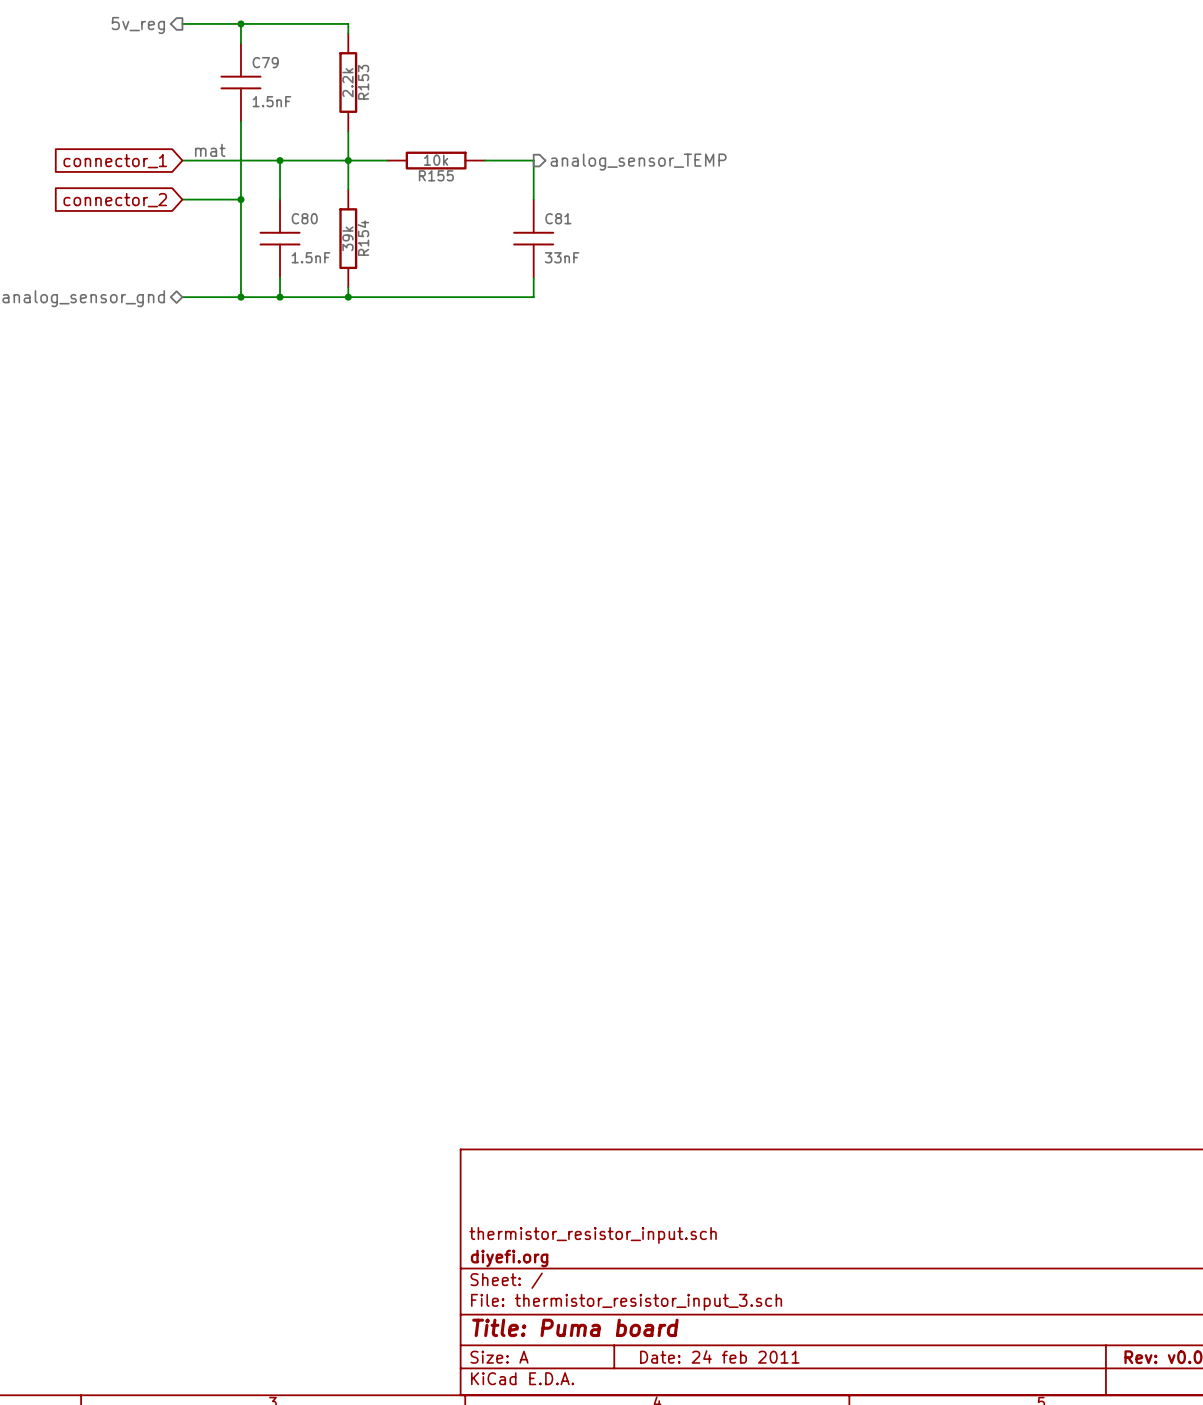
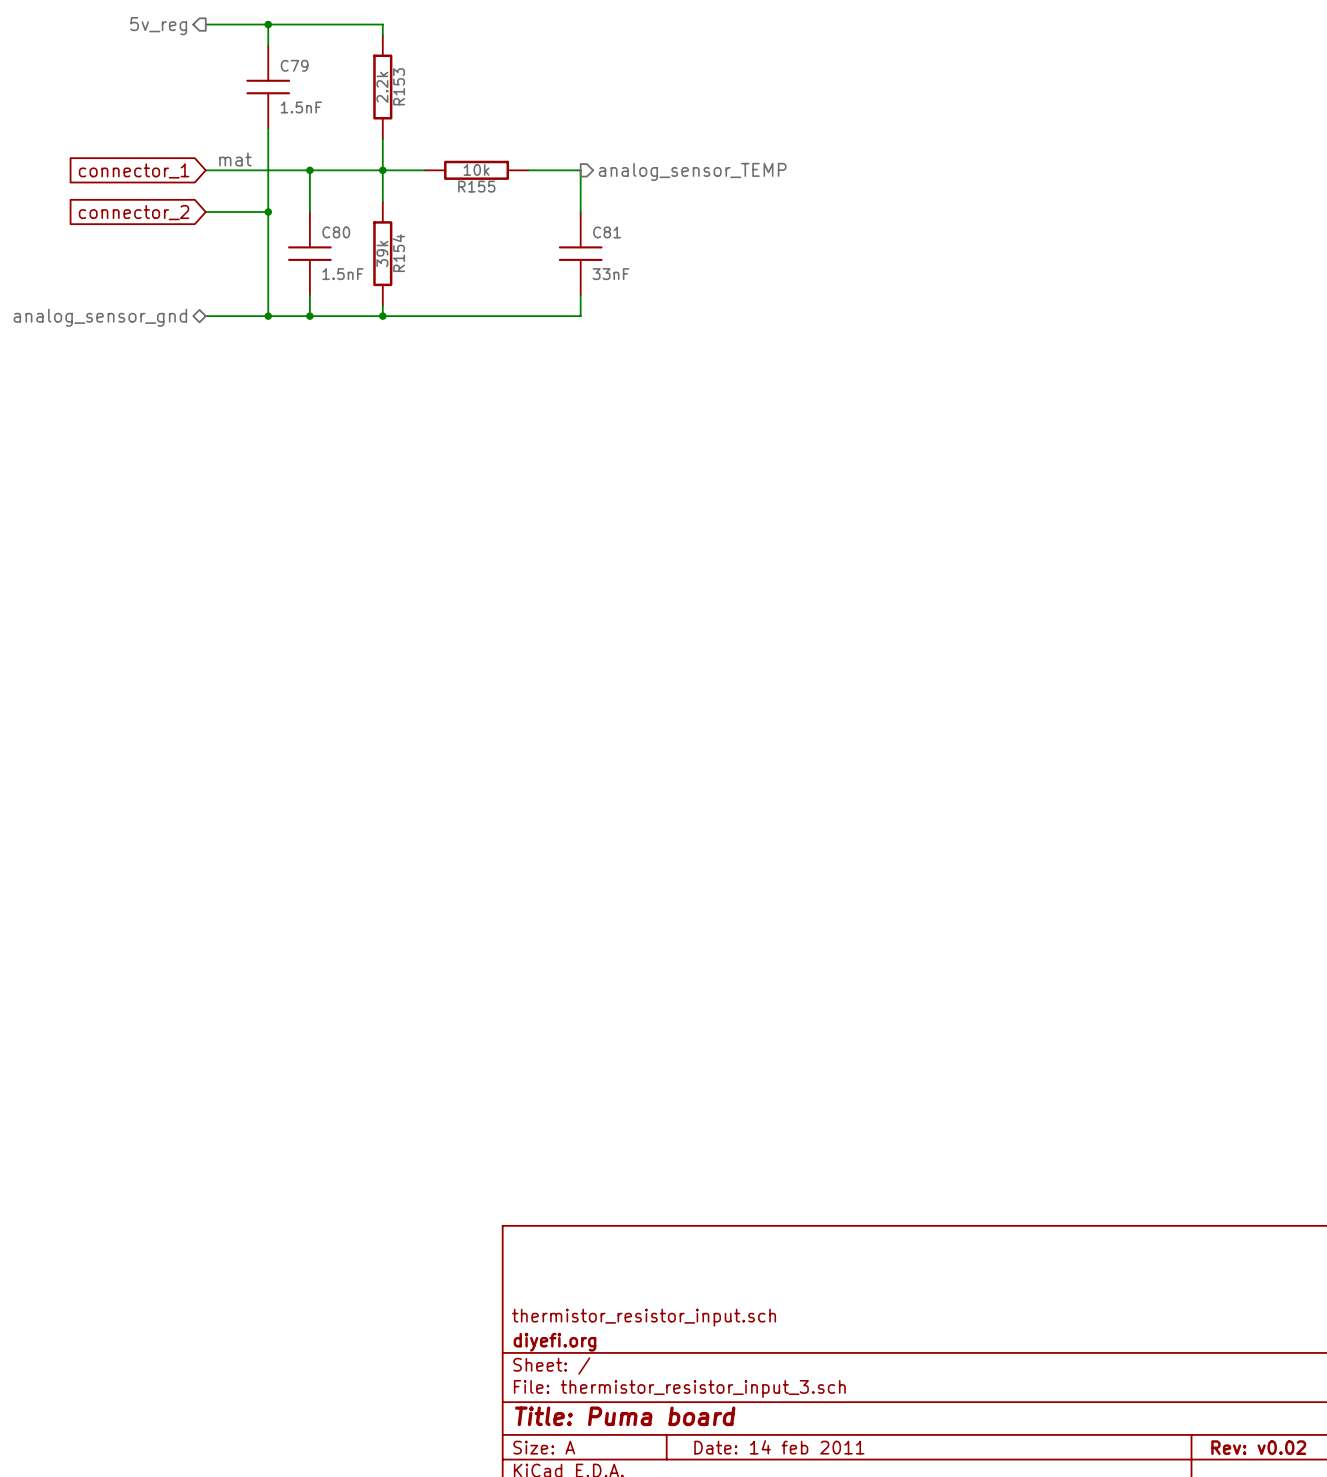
title block: Date: 24 feb 2011 (719, 1356) -> Date: 14 feb 2011 (779, 1447)

